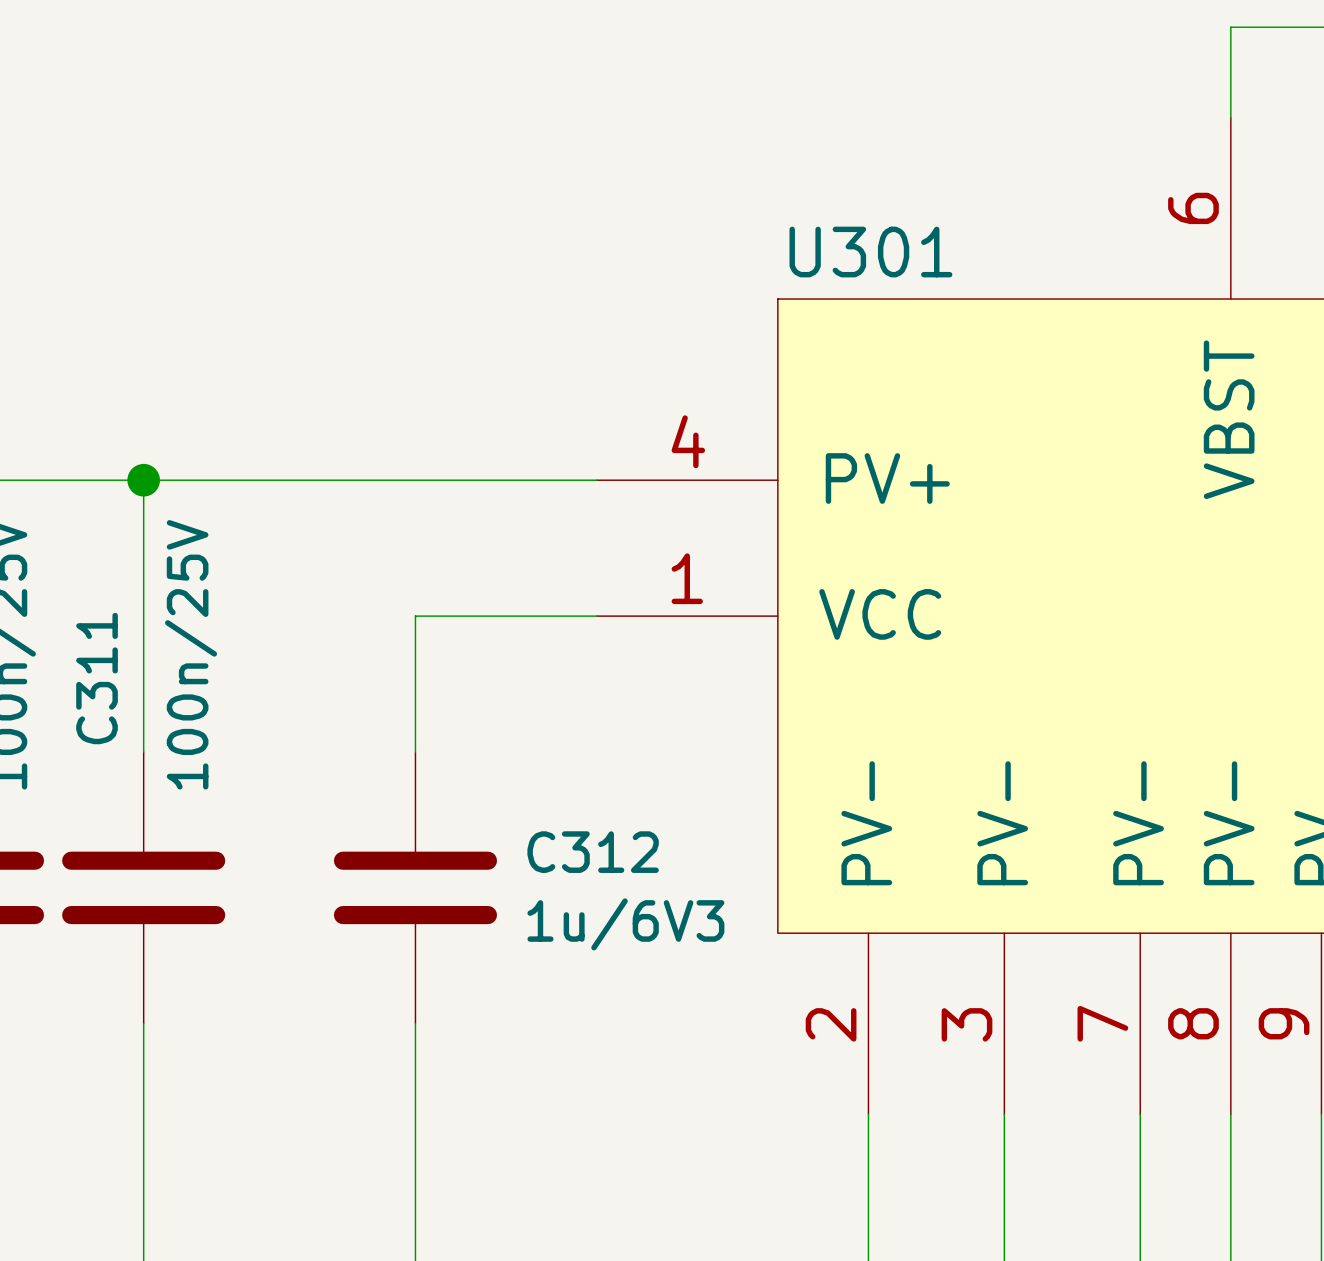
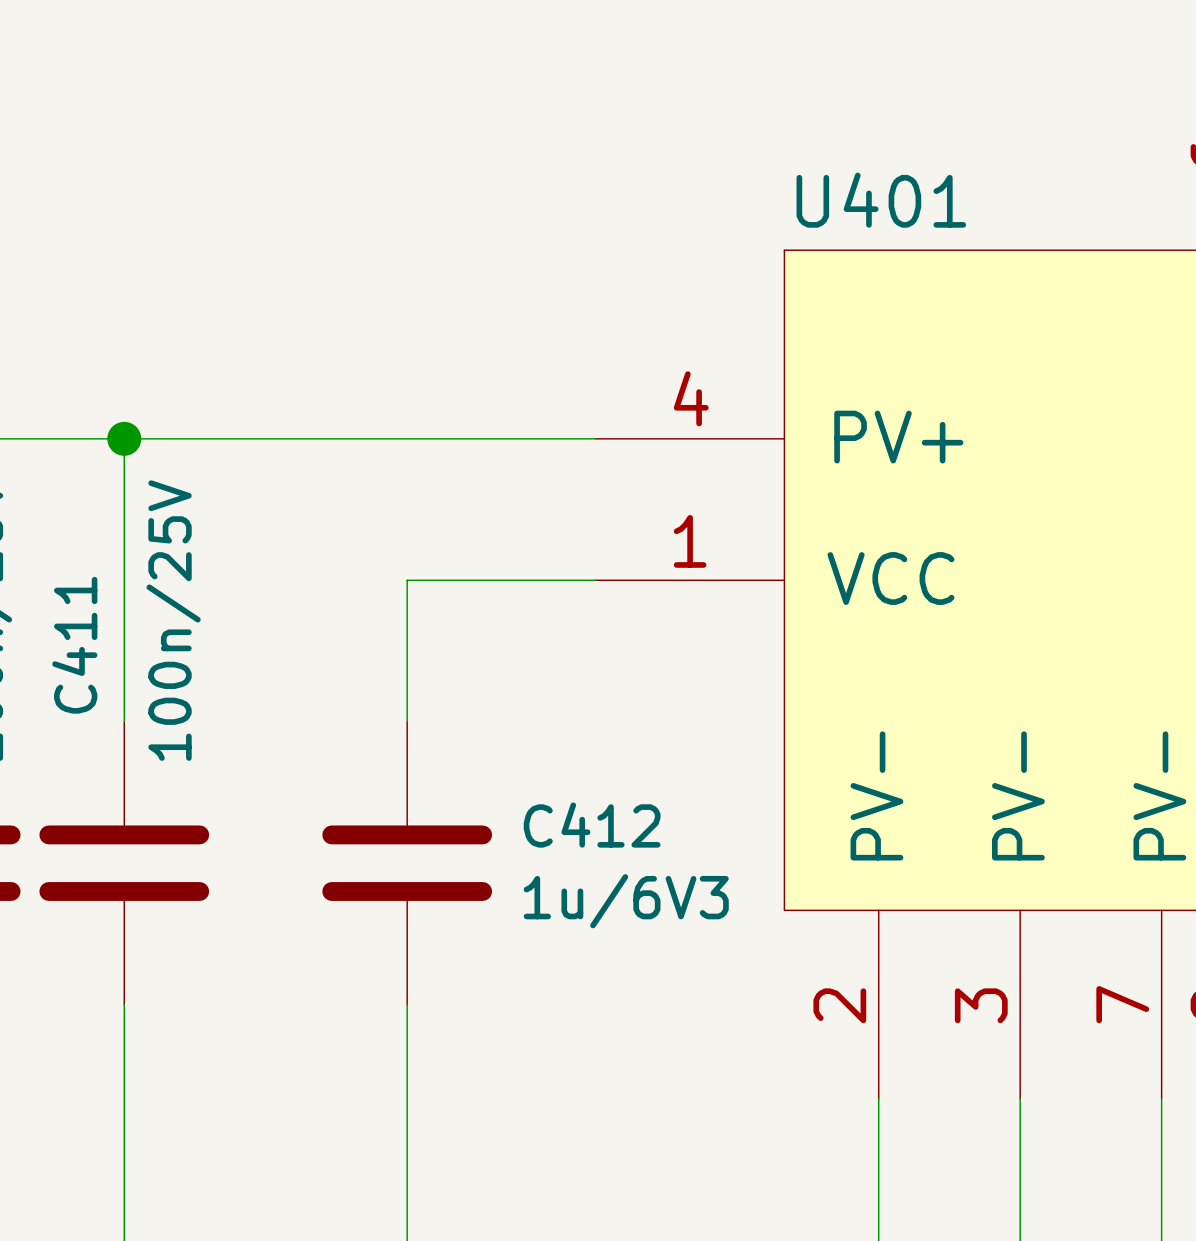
U301 name: U301 (870, 252) -> U401 (881, 200)
C311 name: C311 (97, 678) -> C411 (74, 645)
C312 name: C312 (593, 852) -> C412 (592, 825)

